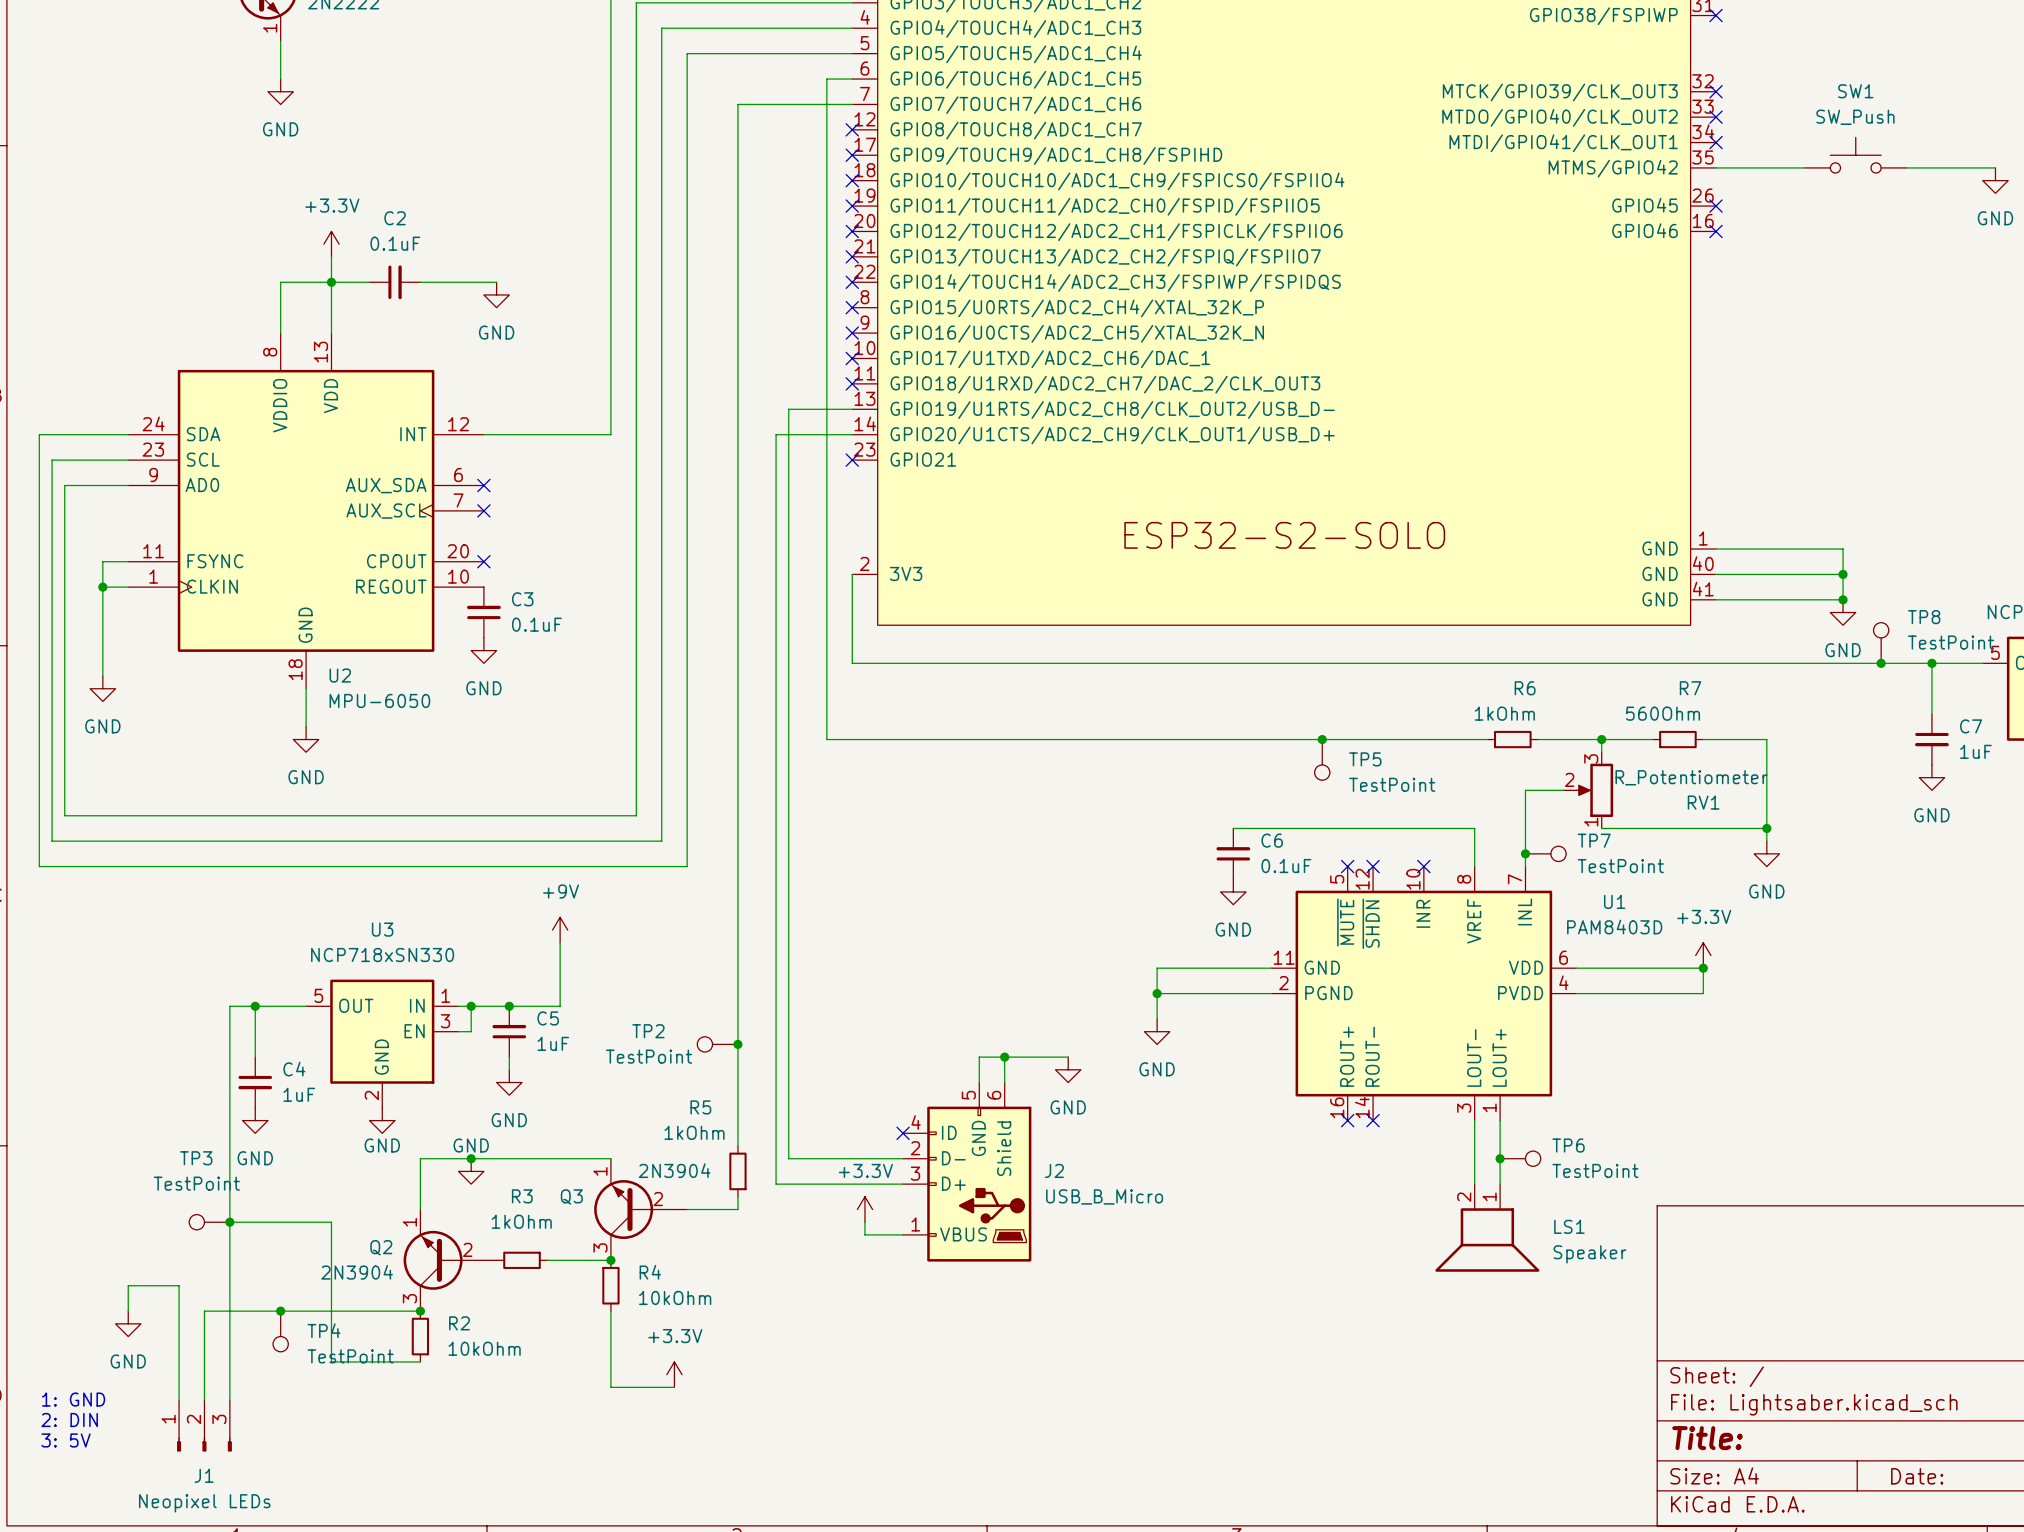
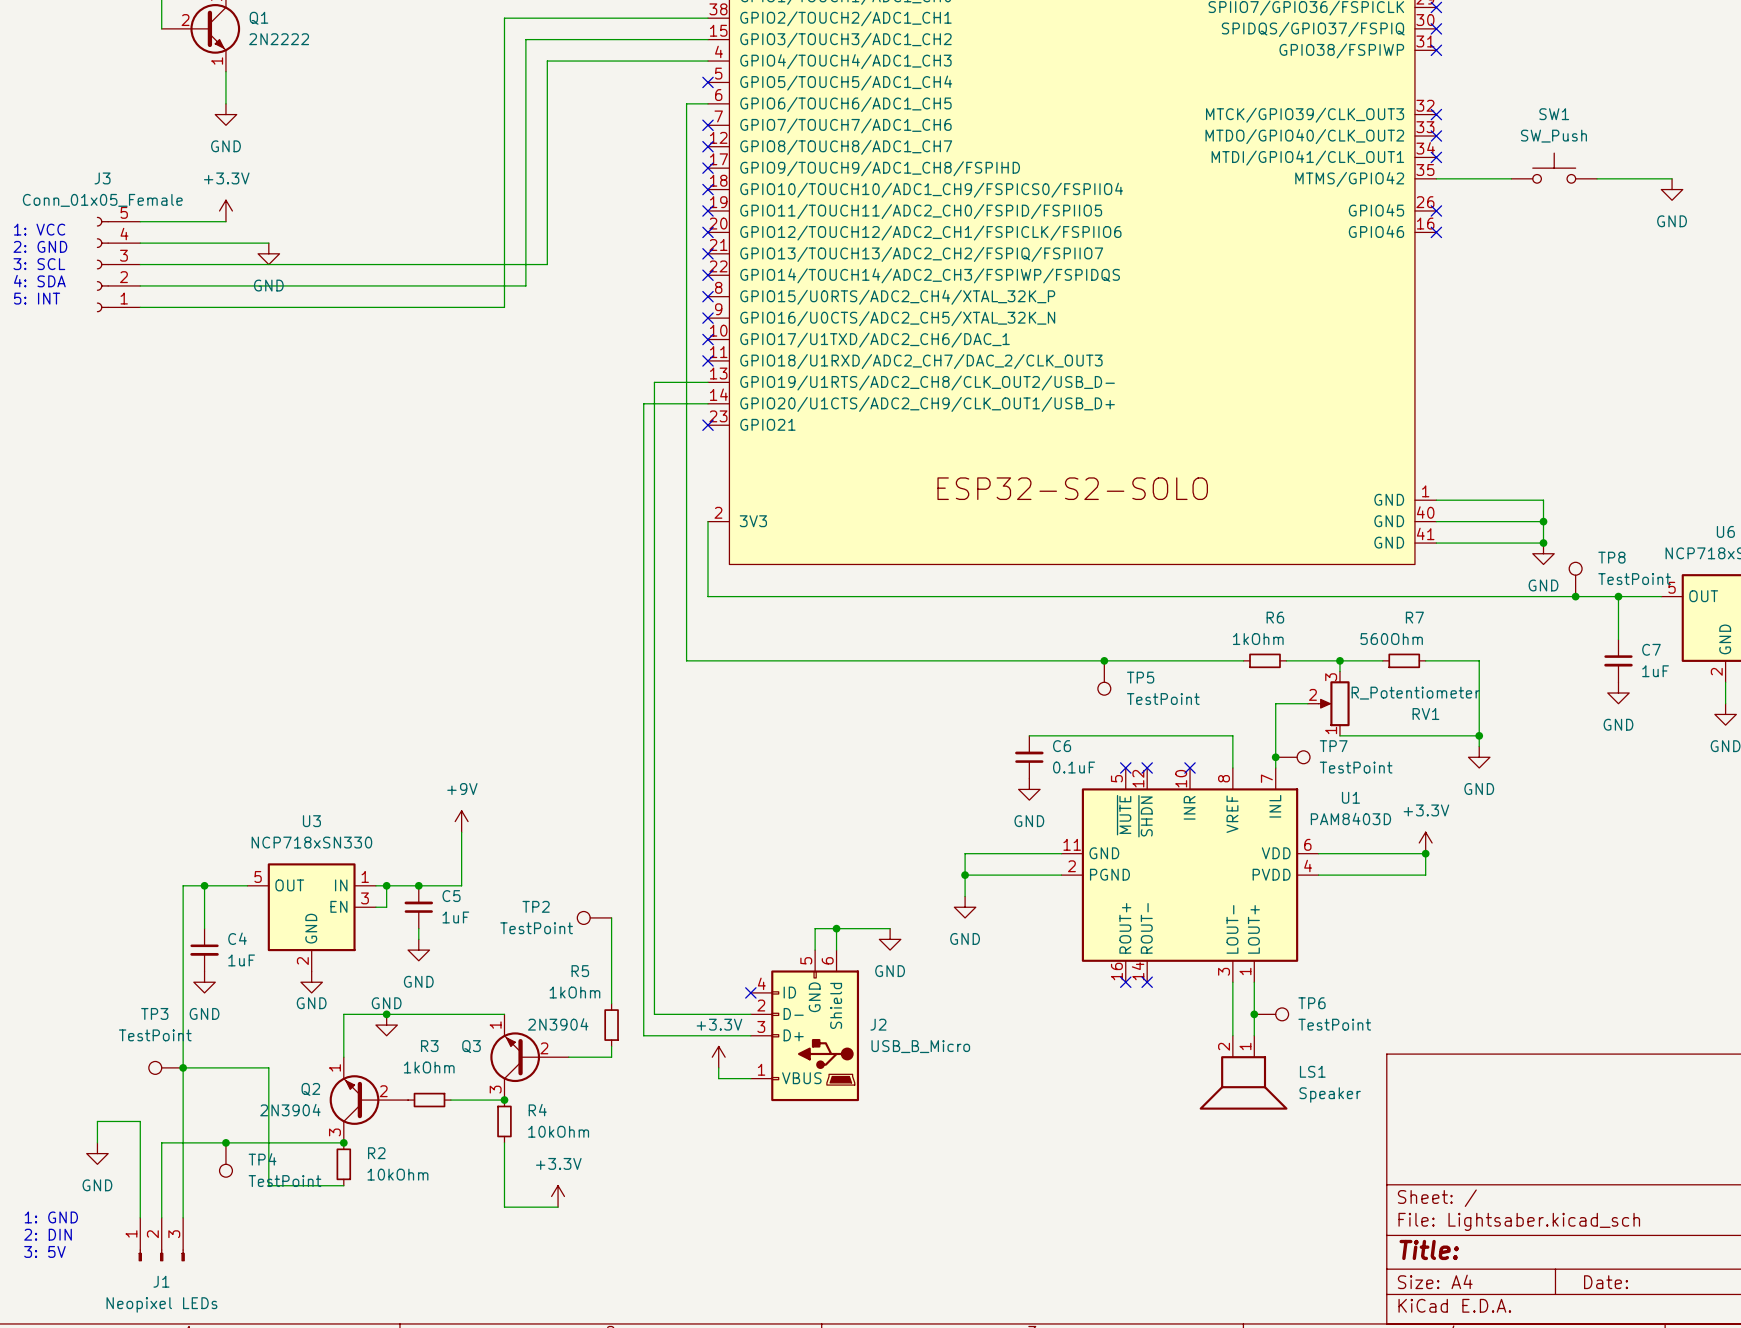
wire: (852, 53) (687, 53) (687, 866) (39, 866) (39, 434) (128, 434) -> none
no-connect mark: none -> (708, 82)
wire: (852, 104) (737, 104) (737, 1044) -> none
no-connect mark: none -> (708, 125)
wire: none -> (140, 221) (225, 221)
text: none -> 1: VCC (39, 229)
wire: none -> (140, 243) (268, 243)
power symbol position: +3.3V (331, 244) -> +3.3V (225, 210)
text: none -> 2: GND (40, 246)
wire: (331, 256) (331, 333) -> none
text: none -> 3: SCL (39, 264)
J3: none -> Conn_01x05_Female (118, 264)
wire: (661, 269) (661, 841) (52, 841) (52, 460) (128, 460) -> (547, 264) (140, 264)
junction: (331, 282) -> none
wire: (369, 282) (280, 282) (280, 333) -> none
C2: 0.1uF (394, 282) -> none
wire: (420, 282) (496, 282) -> none
text: none -> 4: SDA (39, 281)
power symbol position: GND (496, 294) -> GND (268, 253)
wire: (636, 294) (636, 815) (64, 815) (64, 485) (128, 485) -> (525, 285) (140, 285)
text: none -> 5: INT (37, 298)
wire: (610, 320) (610, 434) (483, 434) -> (504, 307) (140, 307)
no-connect mark: (483, 485) -> none
U2: MPU-6050 (306, 510) -> none
no-connect mark: (483, 510) -> none
wire: (128, 561) (102, 561) (102, 676) -> none
no-connect mark: (483, 561) -> none
wire: (102, 587) (128, 587) -> none
junction: (102, 587) -> none
C3: 0.1uF (483, 612) -> none
power symbol: GND (483, 650) -> none
power symbol: GND (102, 688) -> none
wire: (306, 688) (306, 726) -> none
power symbol: GND (306, 739) -> none
junction: (737, 1044) -> none

